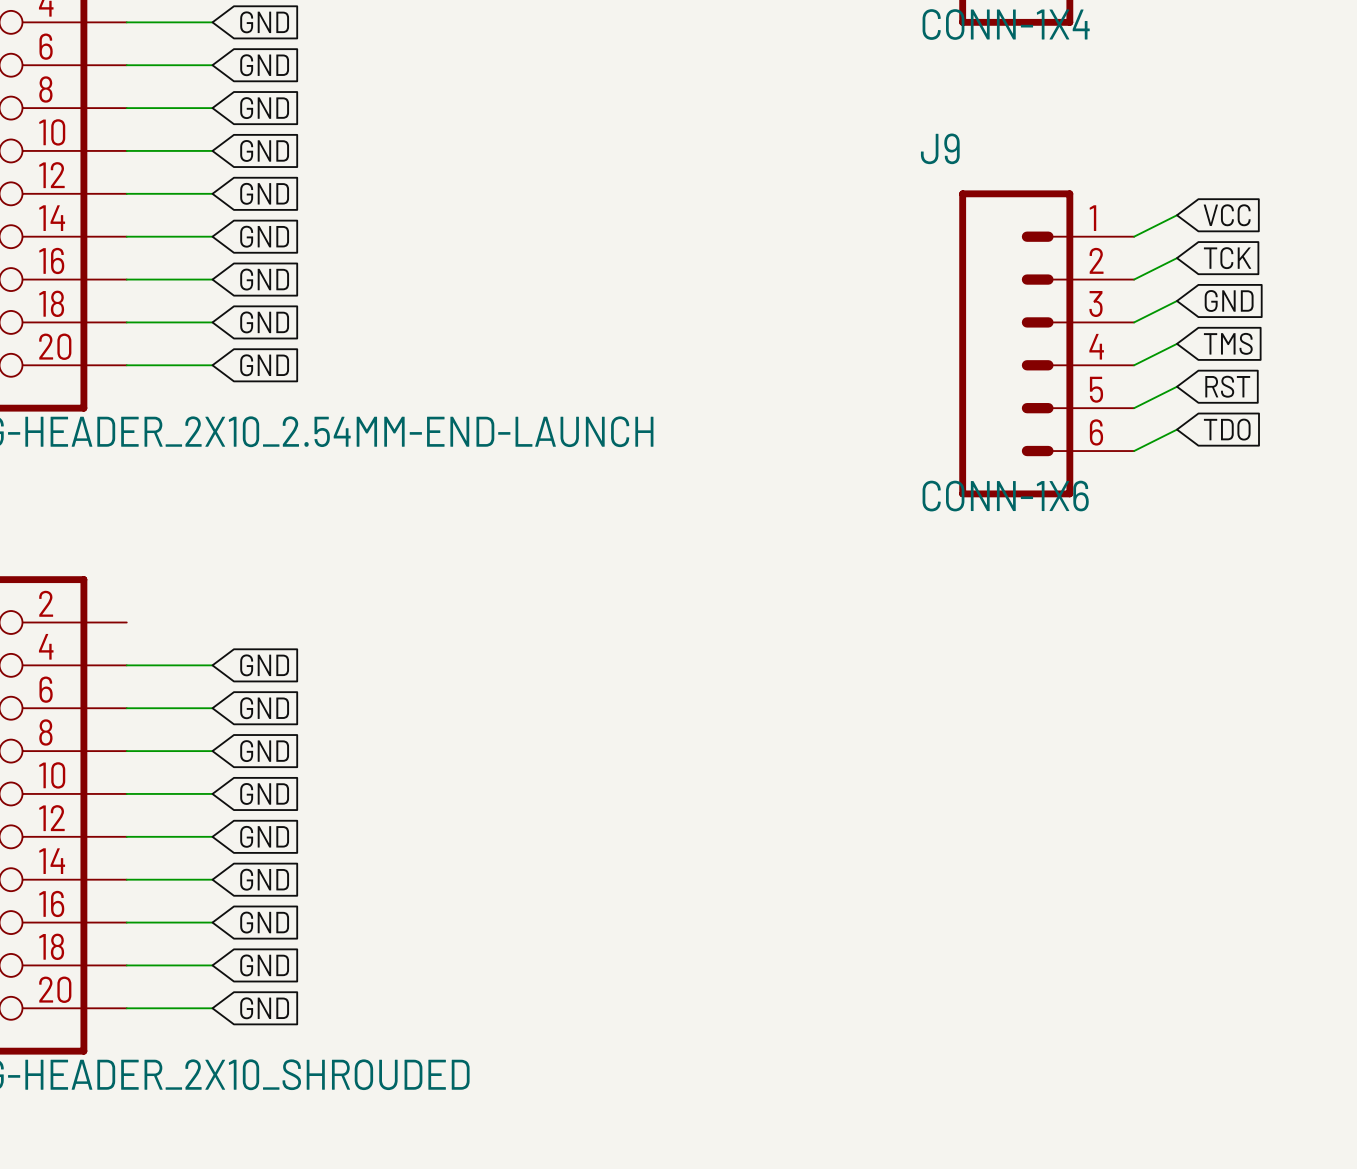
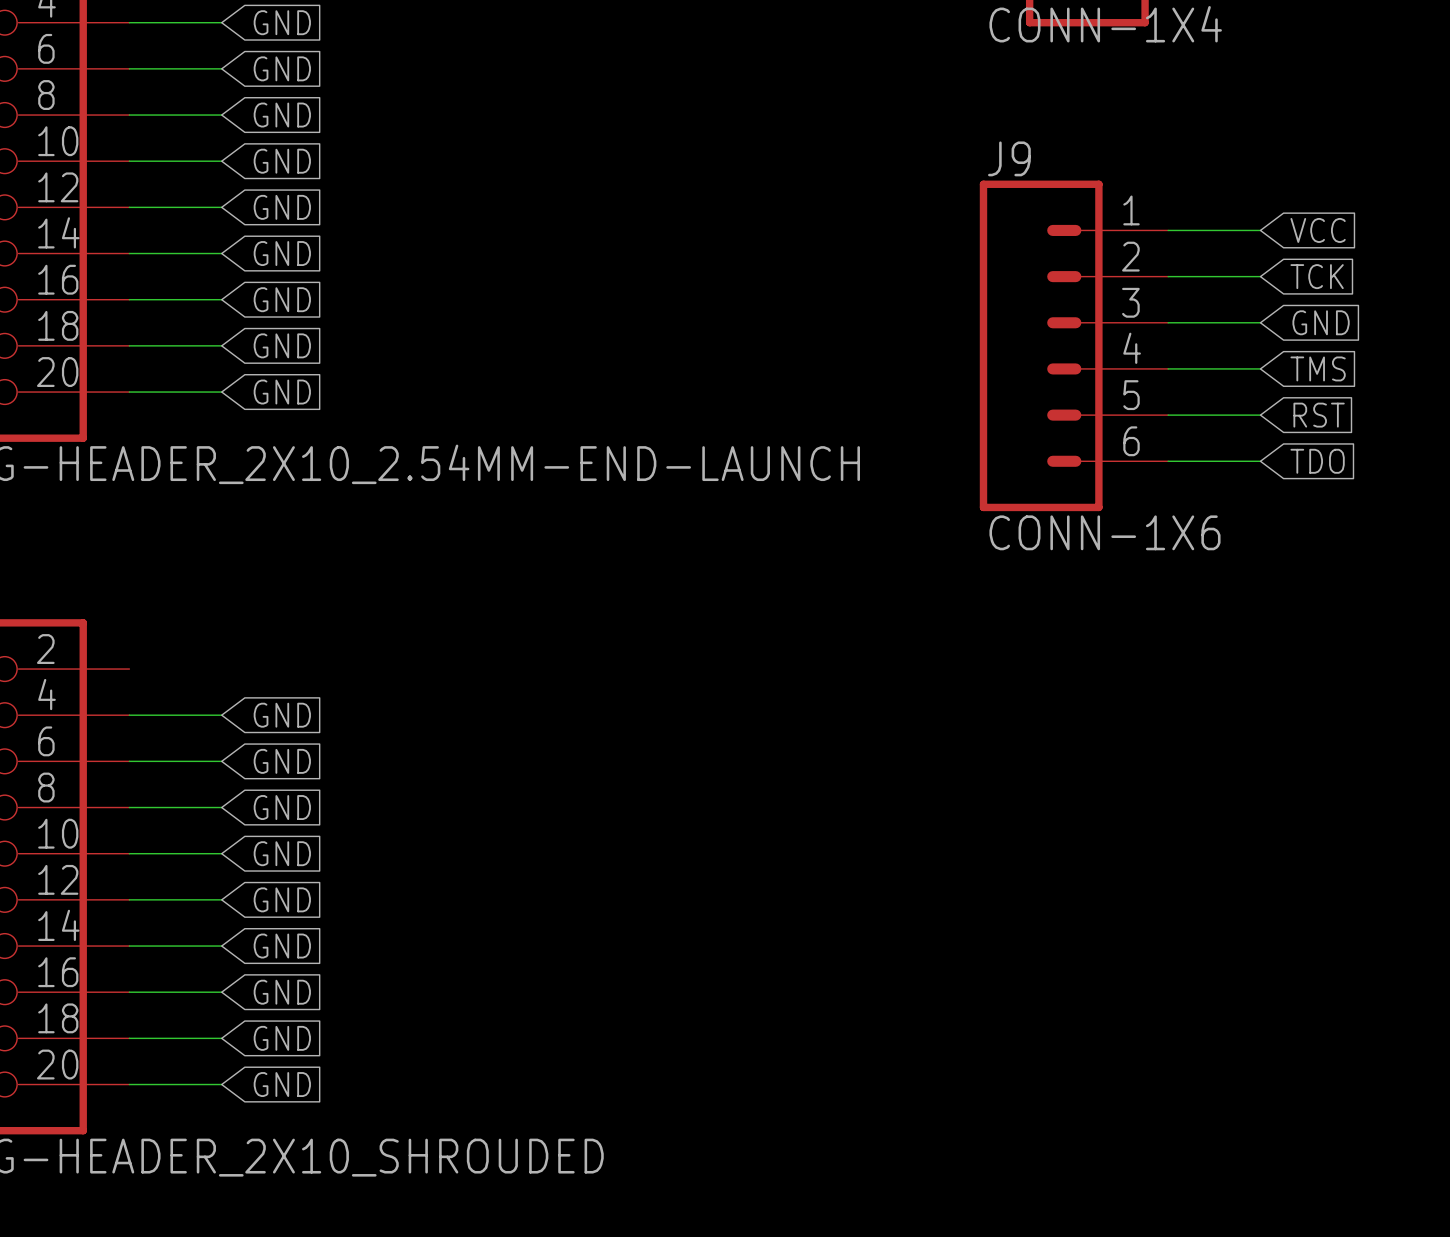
wire: (1177, 215) (1134, 236) -> (1260, 230) (1168, 230)
wire: (1177, 258) (1134, 279) -> (1260, 276) (1168, 276)
wire: (1177, 300) (1134, 322) -> (1260, 322) (1168, 322)
J9 position: (1046, 343) -> (1073, 345)
wire: (1177, 343) (1134, 365) -> (1260, 368) (1168, 368)
wire: (1177, 386) (1134, 408) -> (1260, 415) (1168, 415)
wire: (1177, 429) (1134, 451) -> (1260, 461) (1168, 461)

